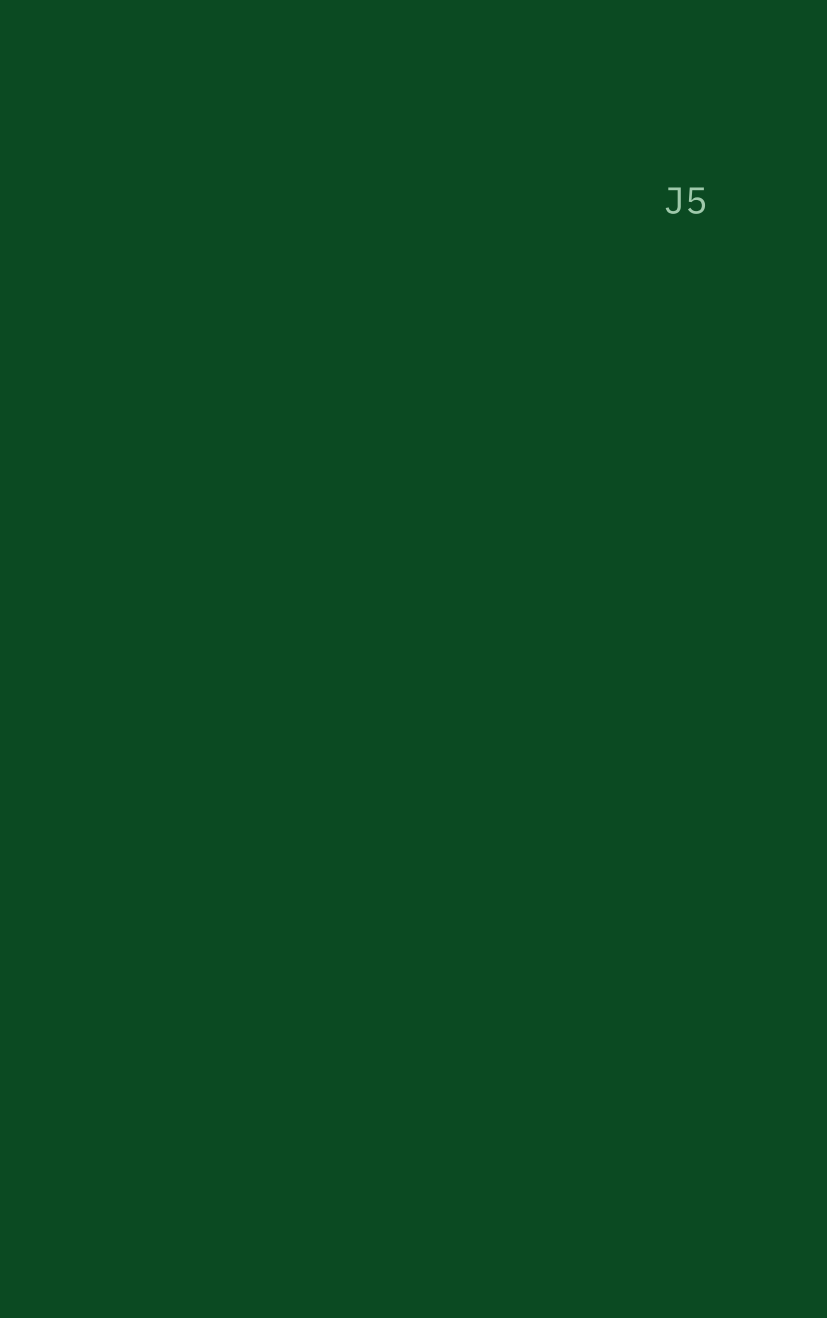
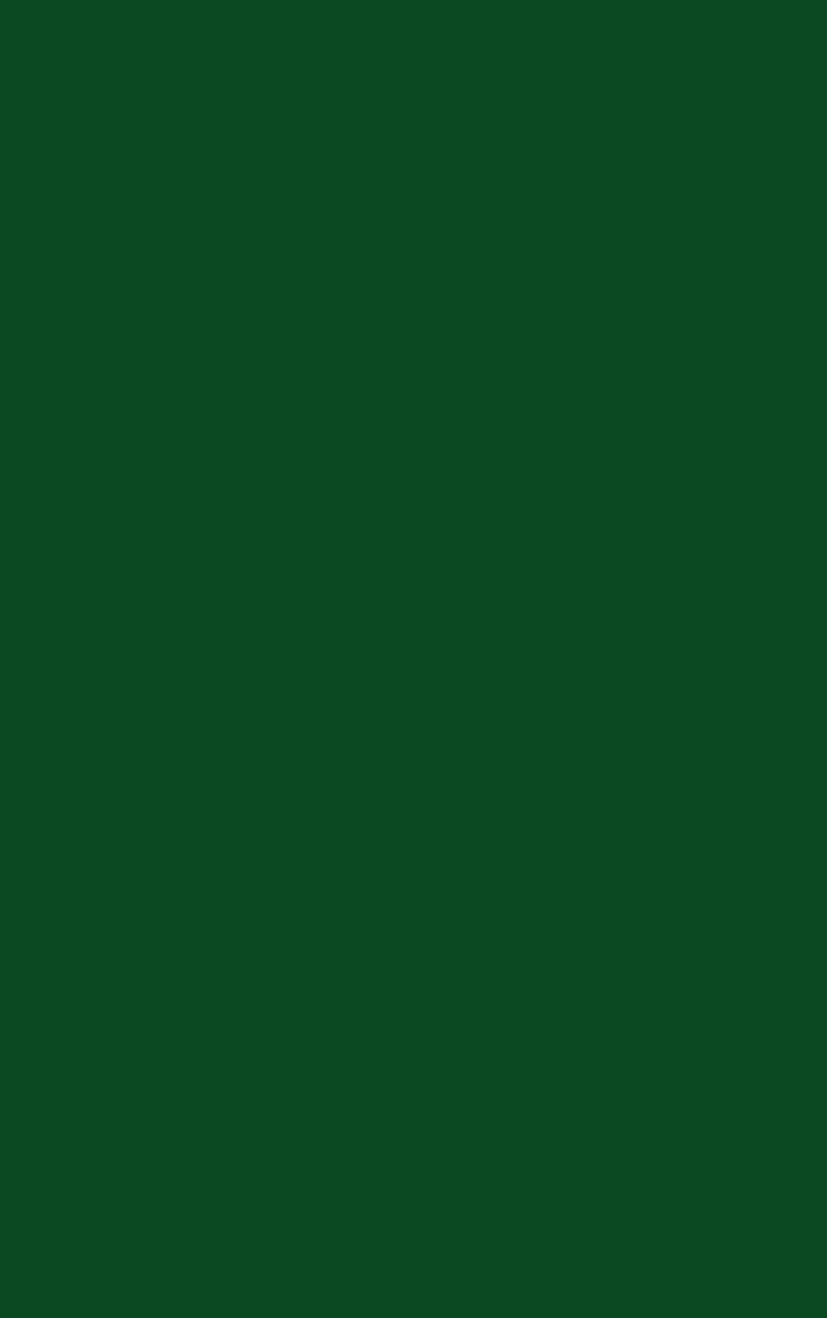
text: J5 (685, 200) -> none

